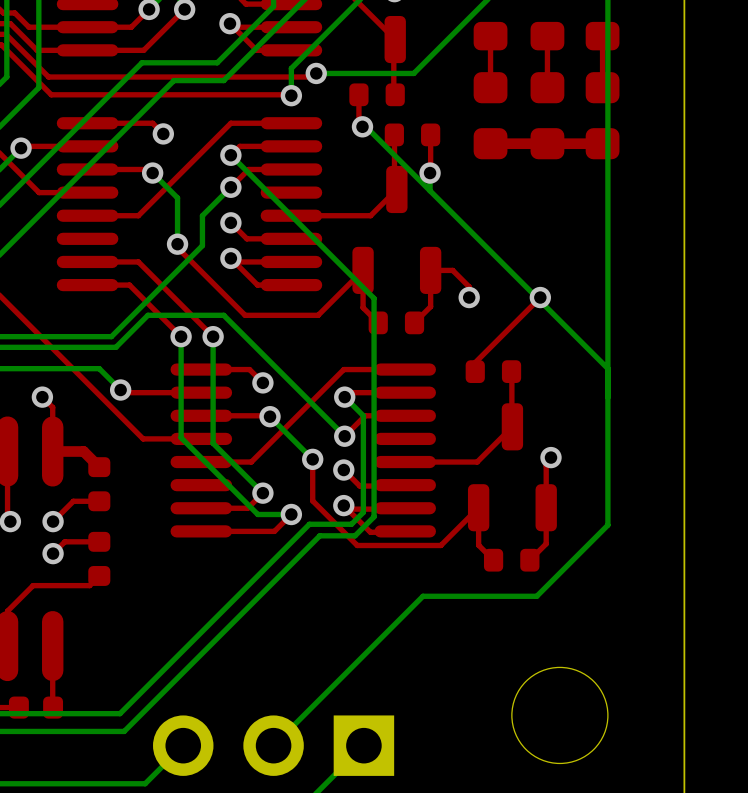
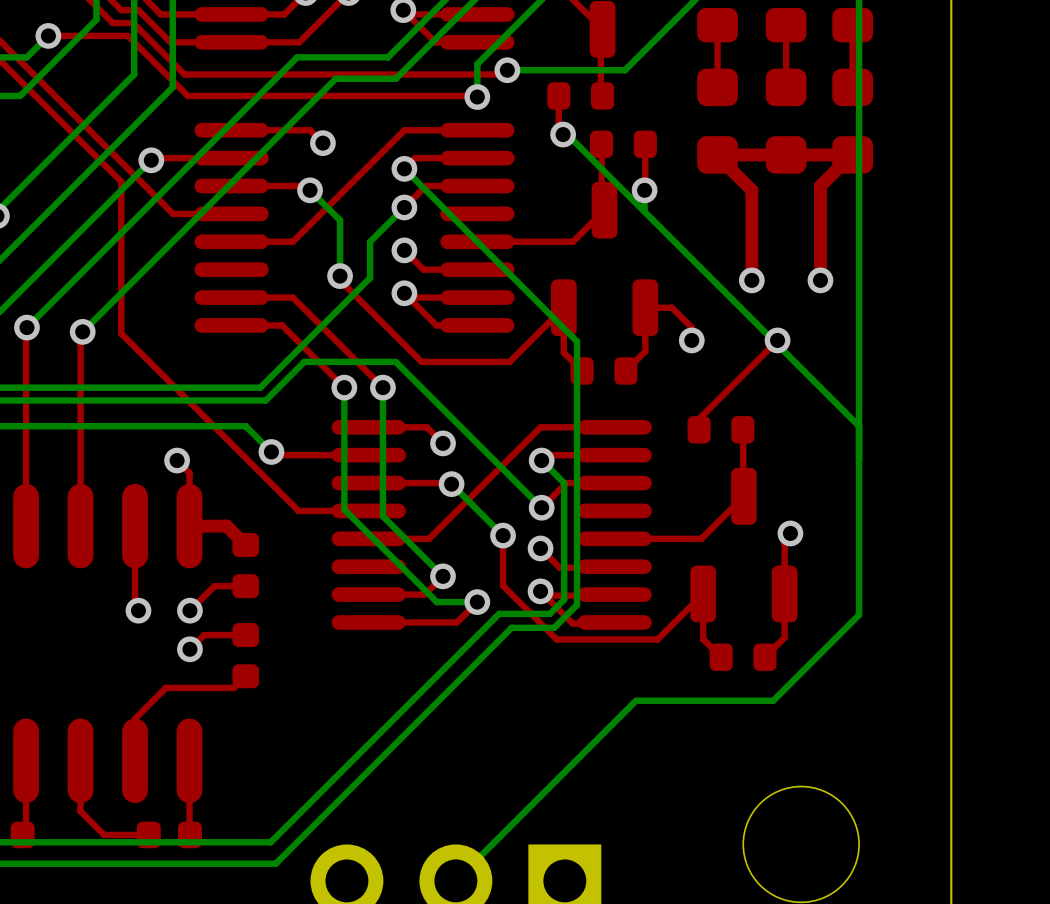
top track: none -> (717, 154) (751, 190) (751, 284)
top track: none -> (851, 154) (820, 186) (820, 280)
via: none -> (751, 280)
via: none -> (820, 280)

